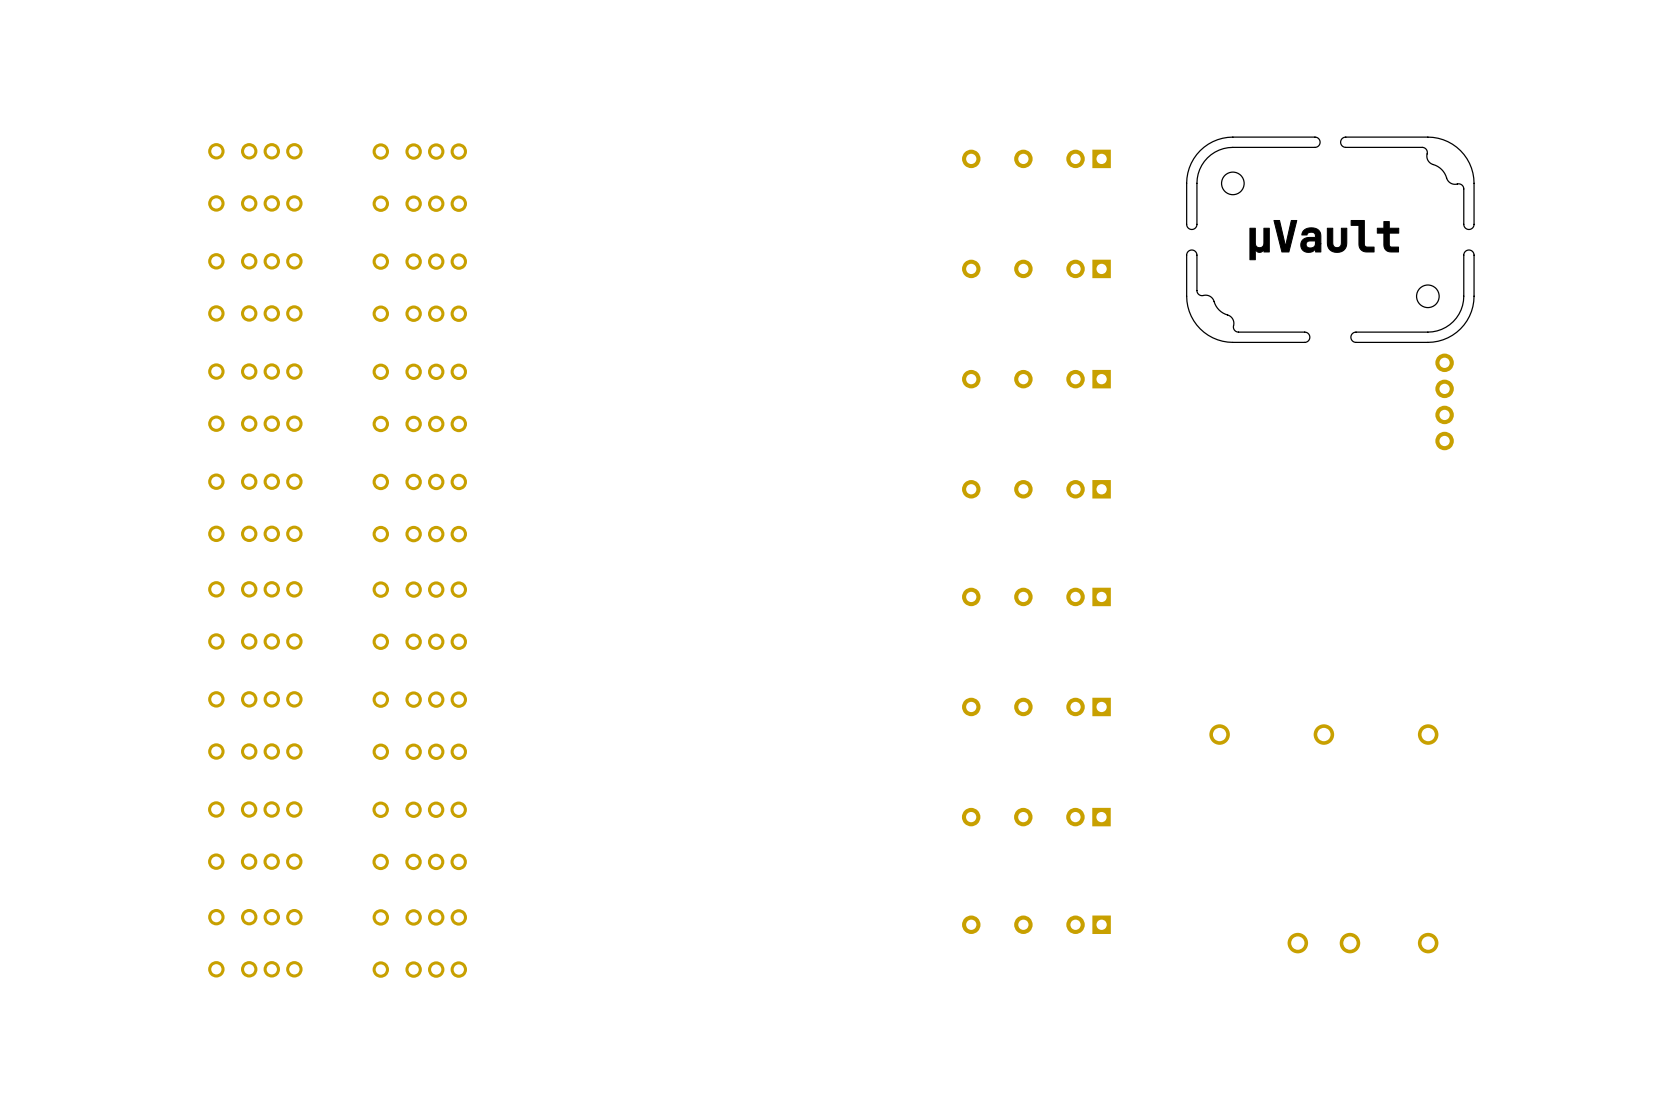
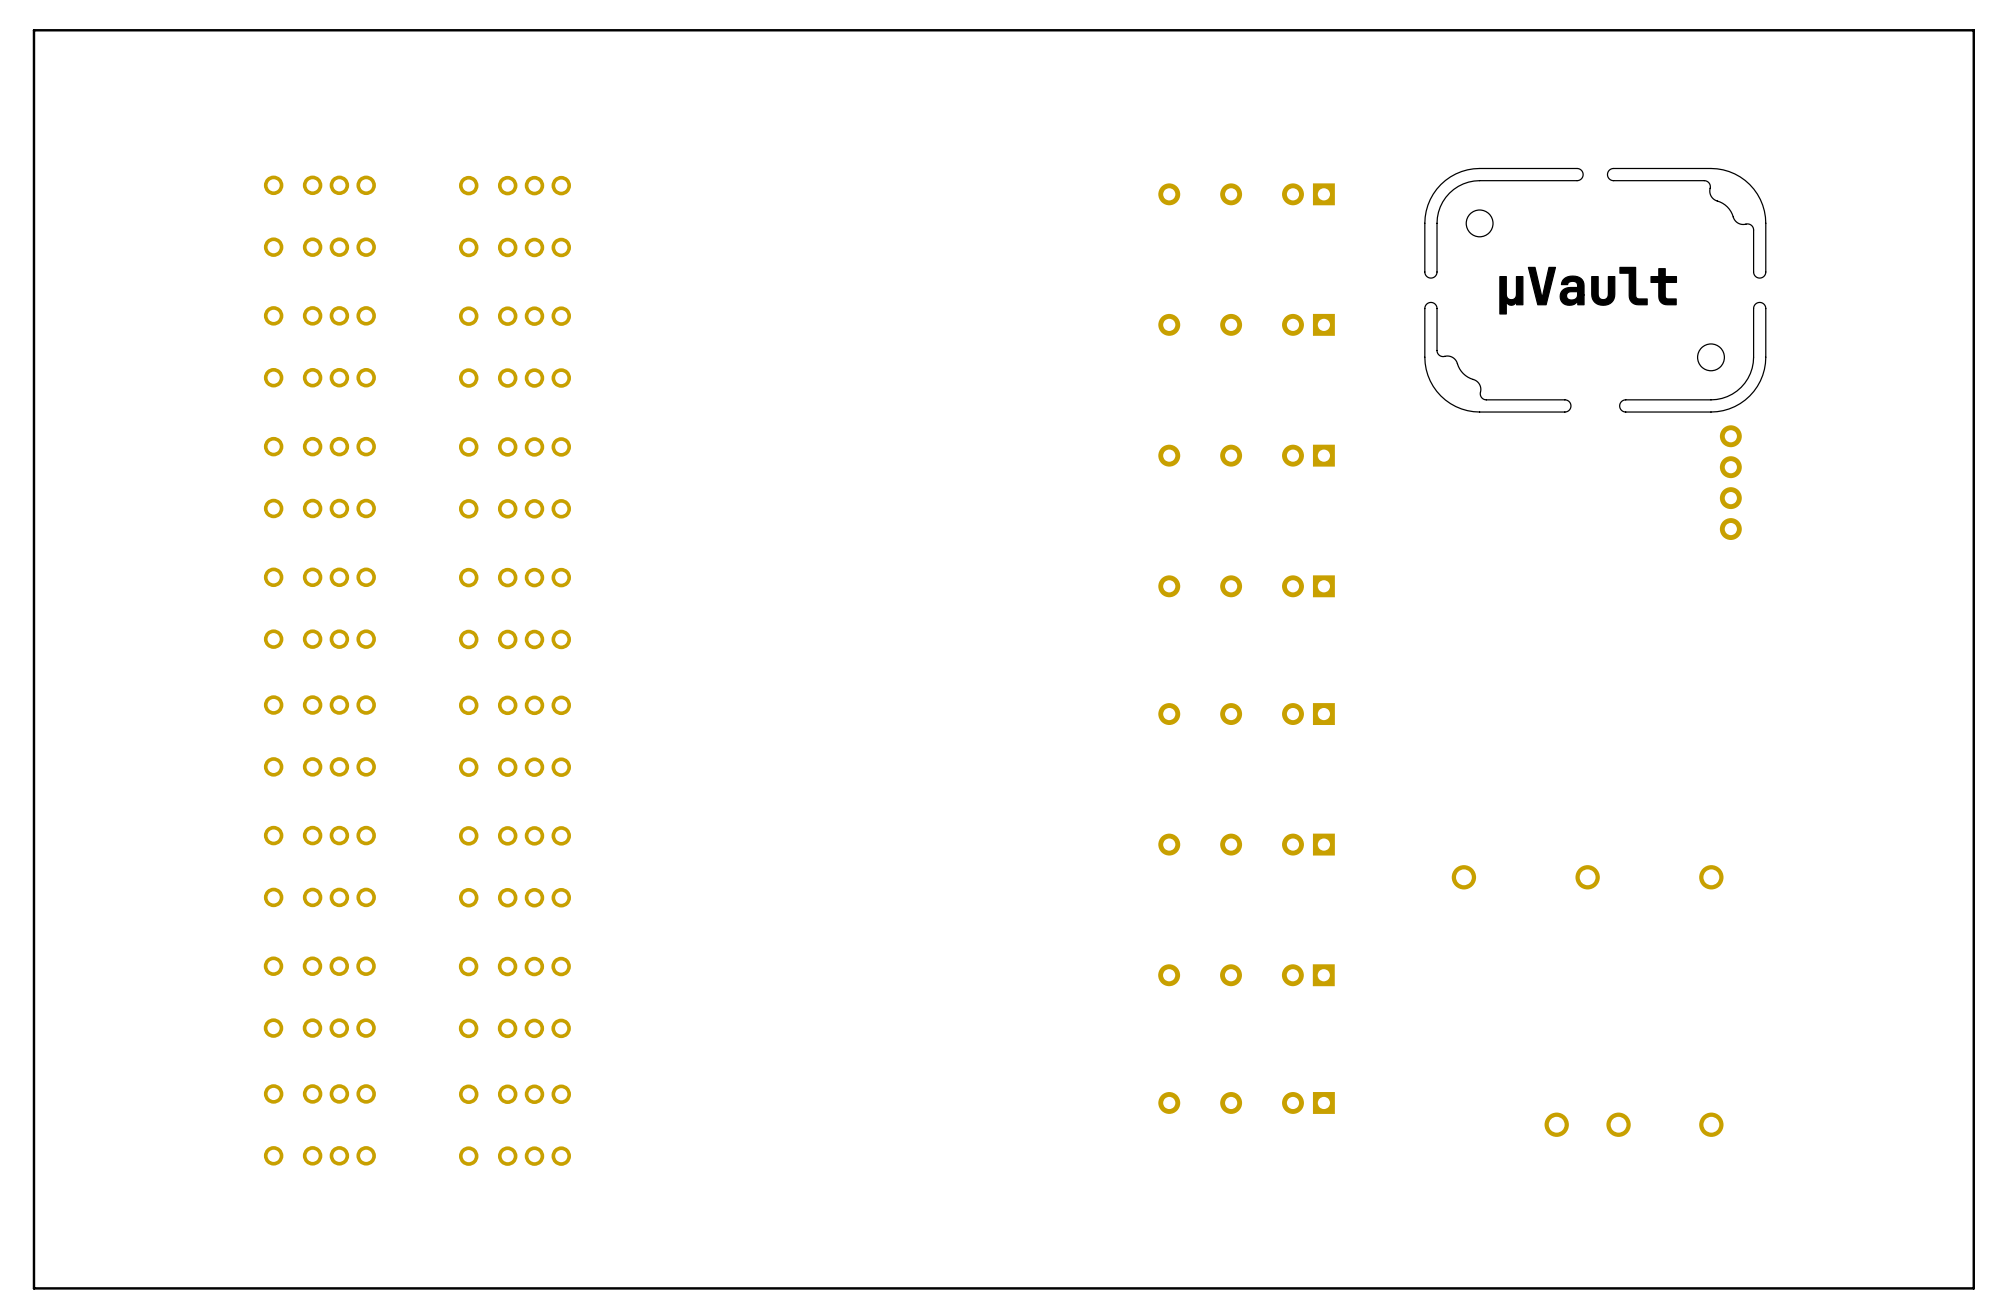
board edge: none -> (1973, 30) (33, 30) (33, 1288) (1973, 1288) (1973, 30)

